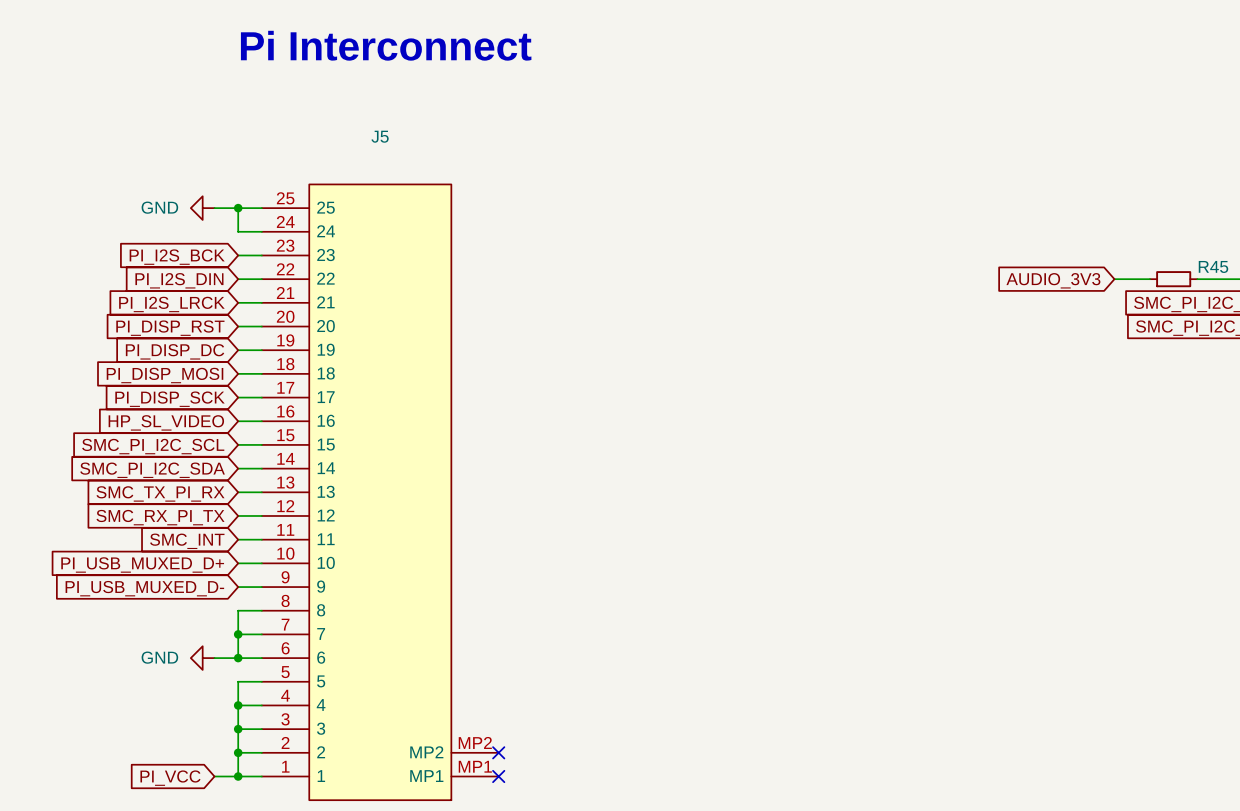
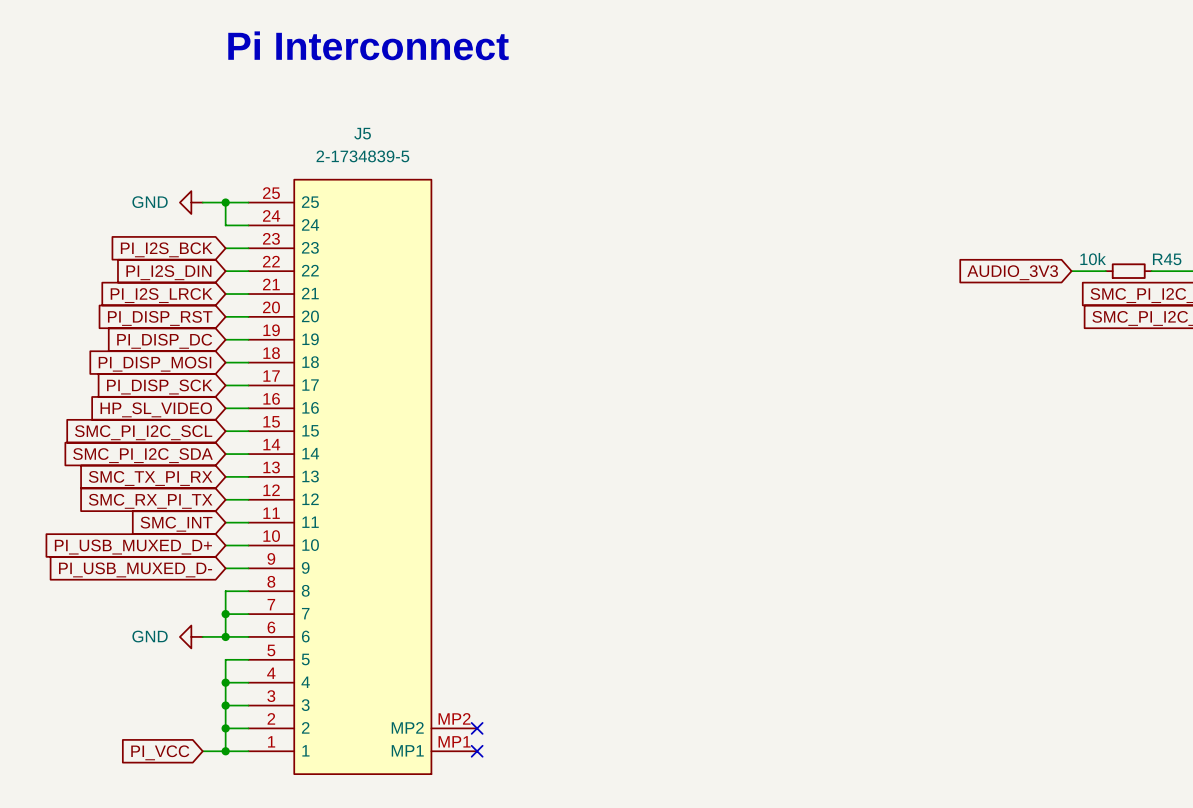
J5 value: none -> 2-1734839-5 (362, 156)
R45 value: none -> 10k (1093, 259)

